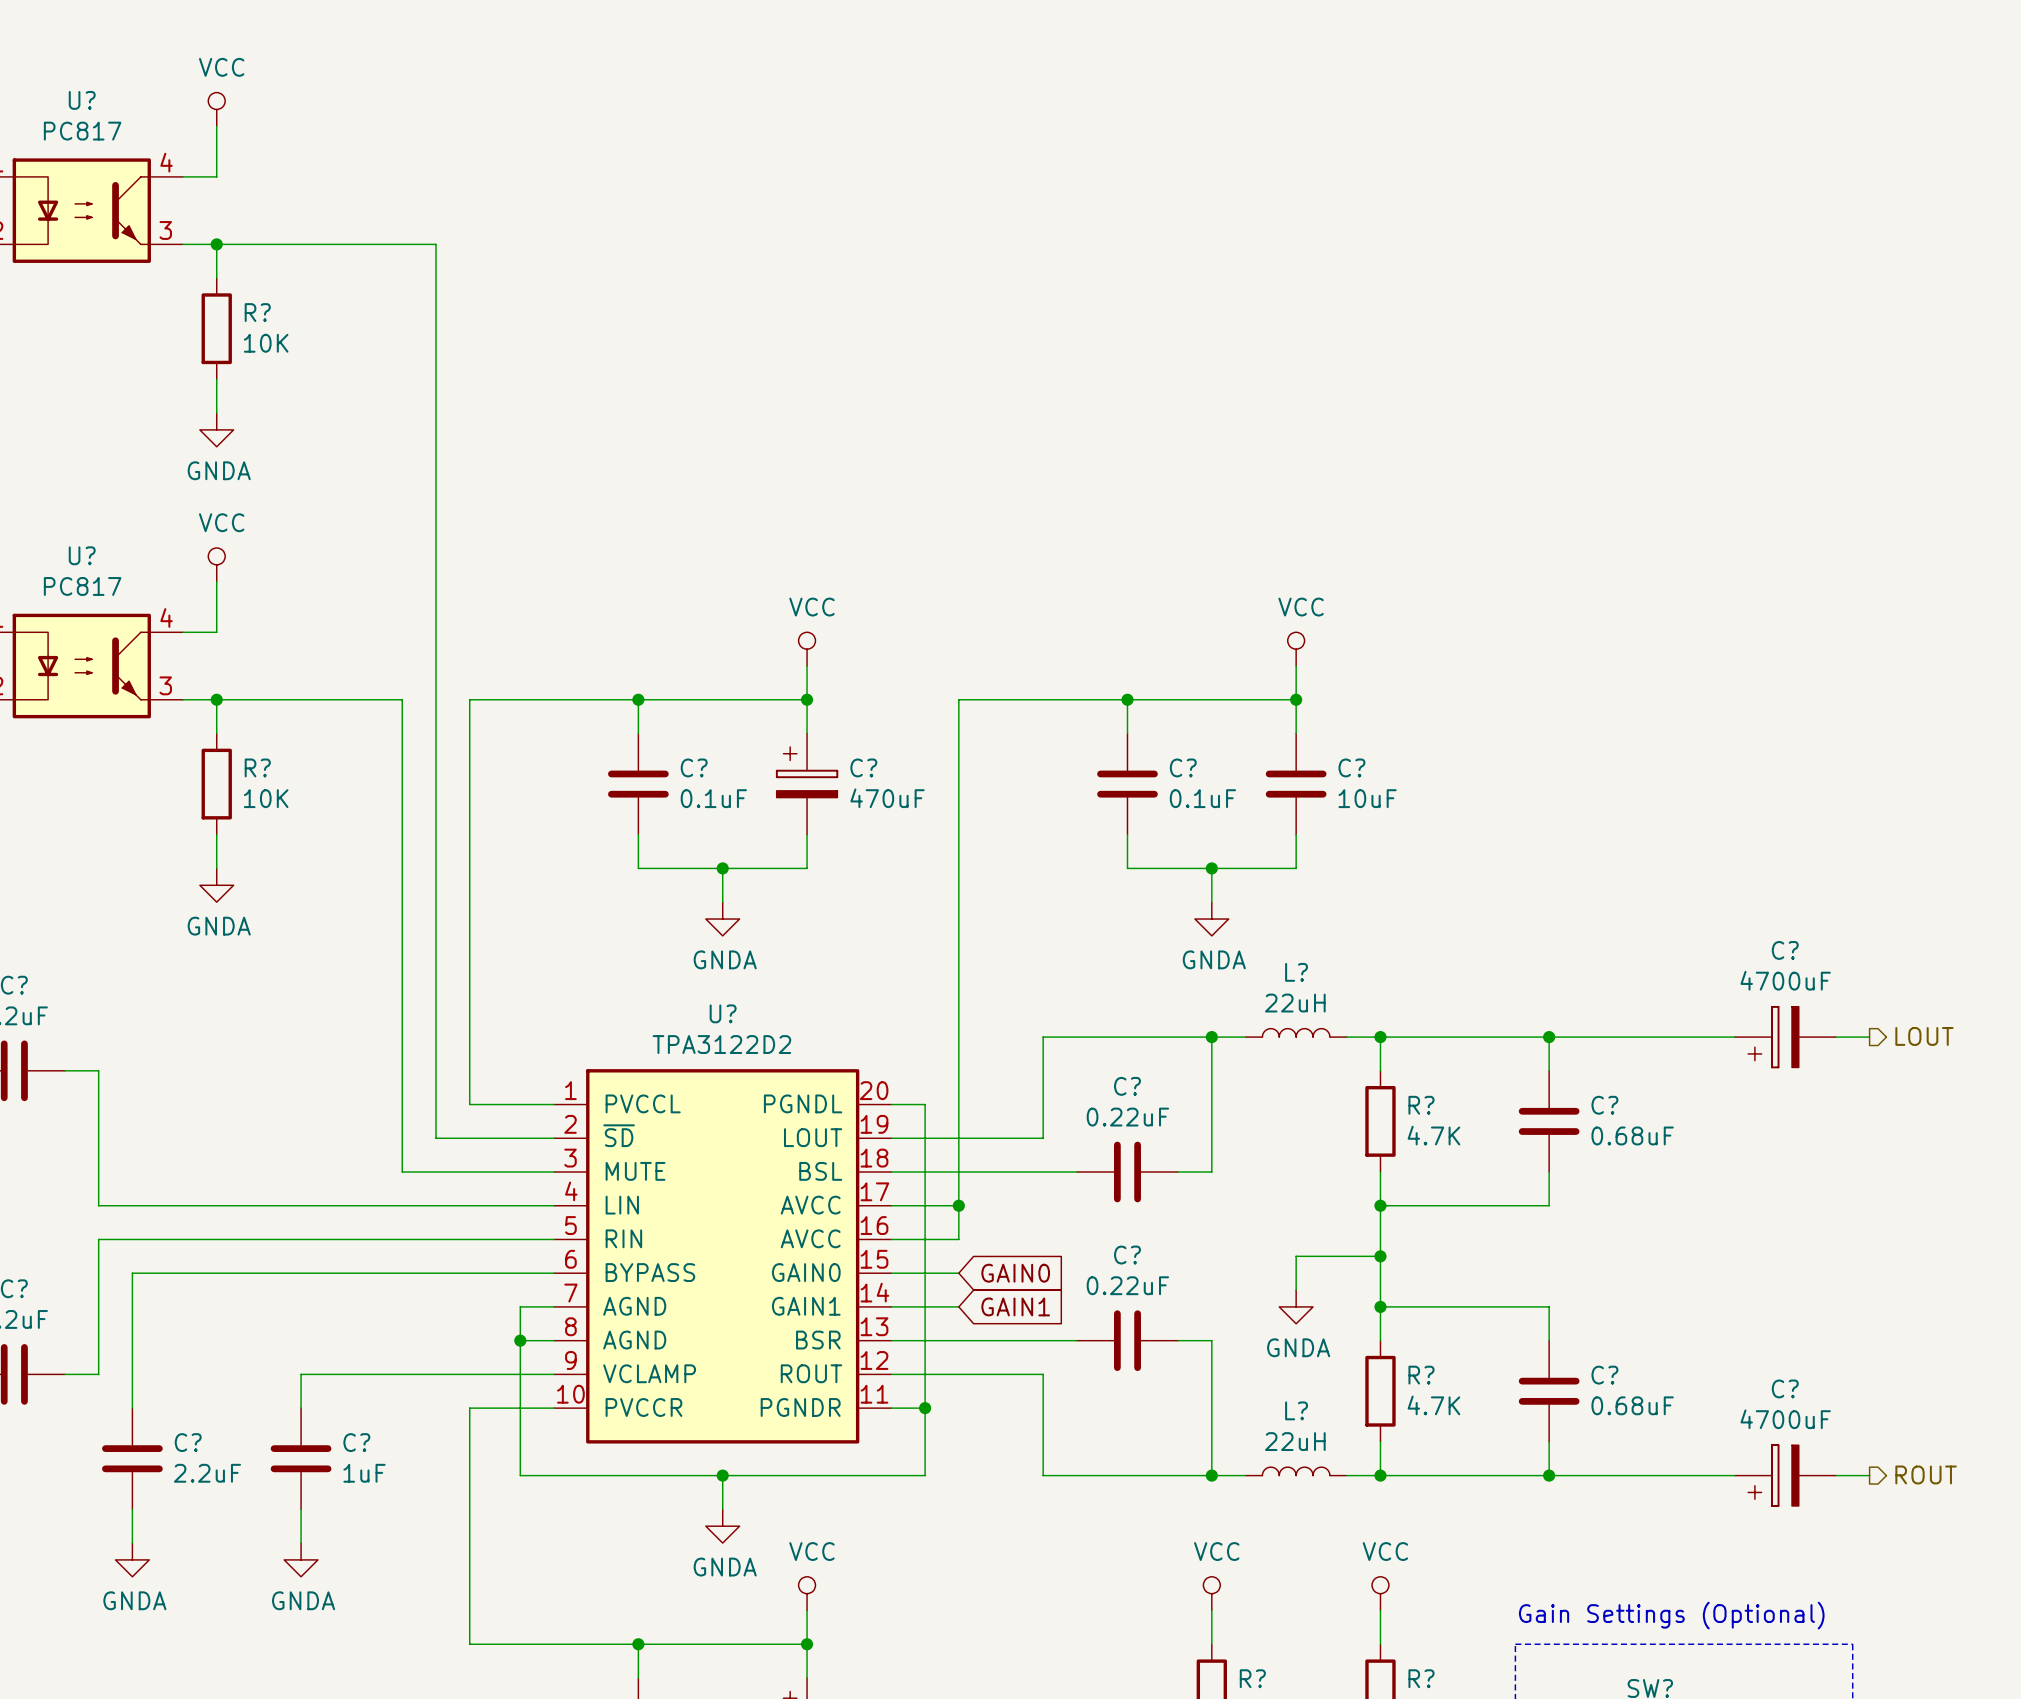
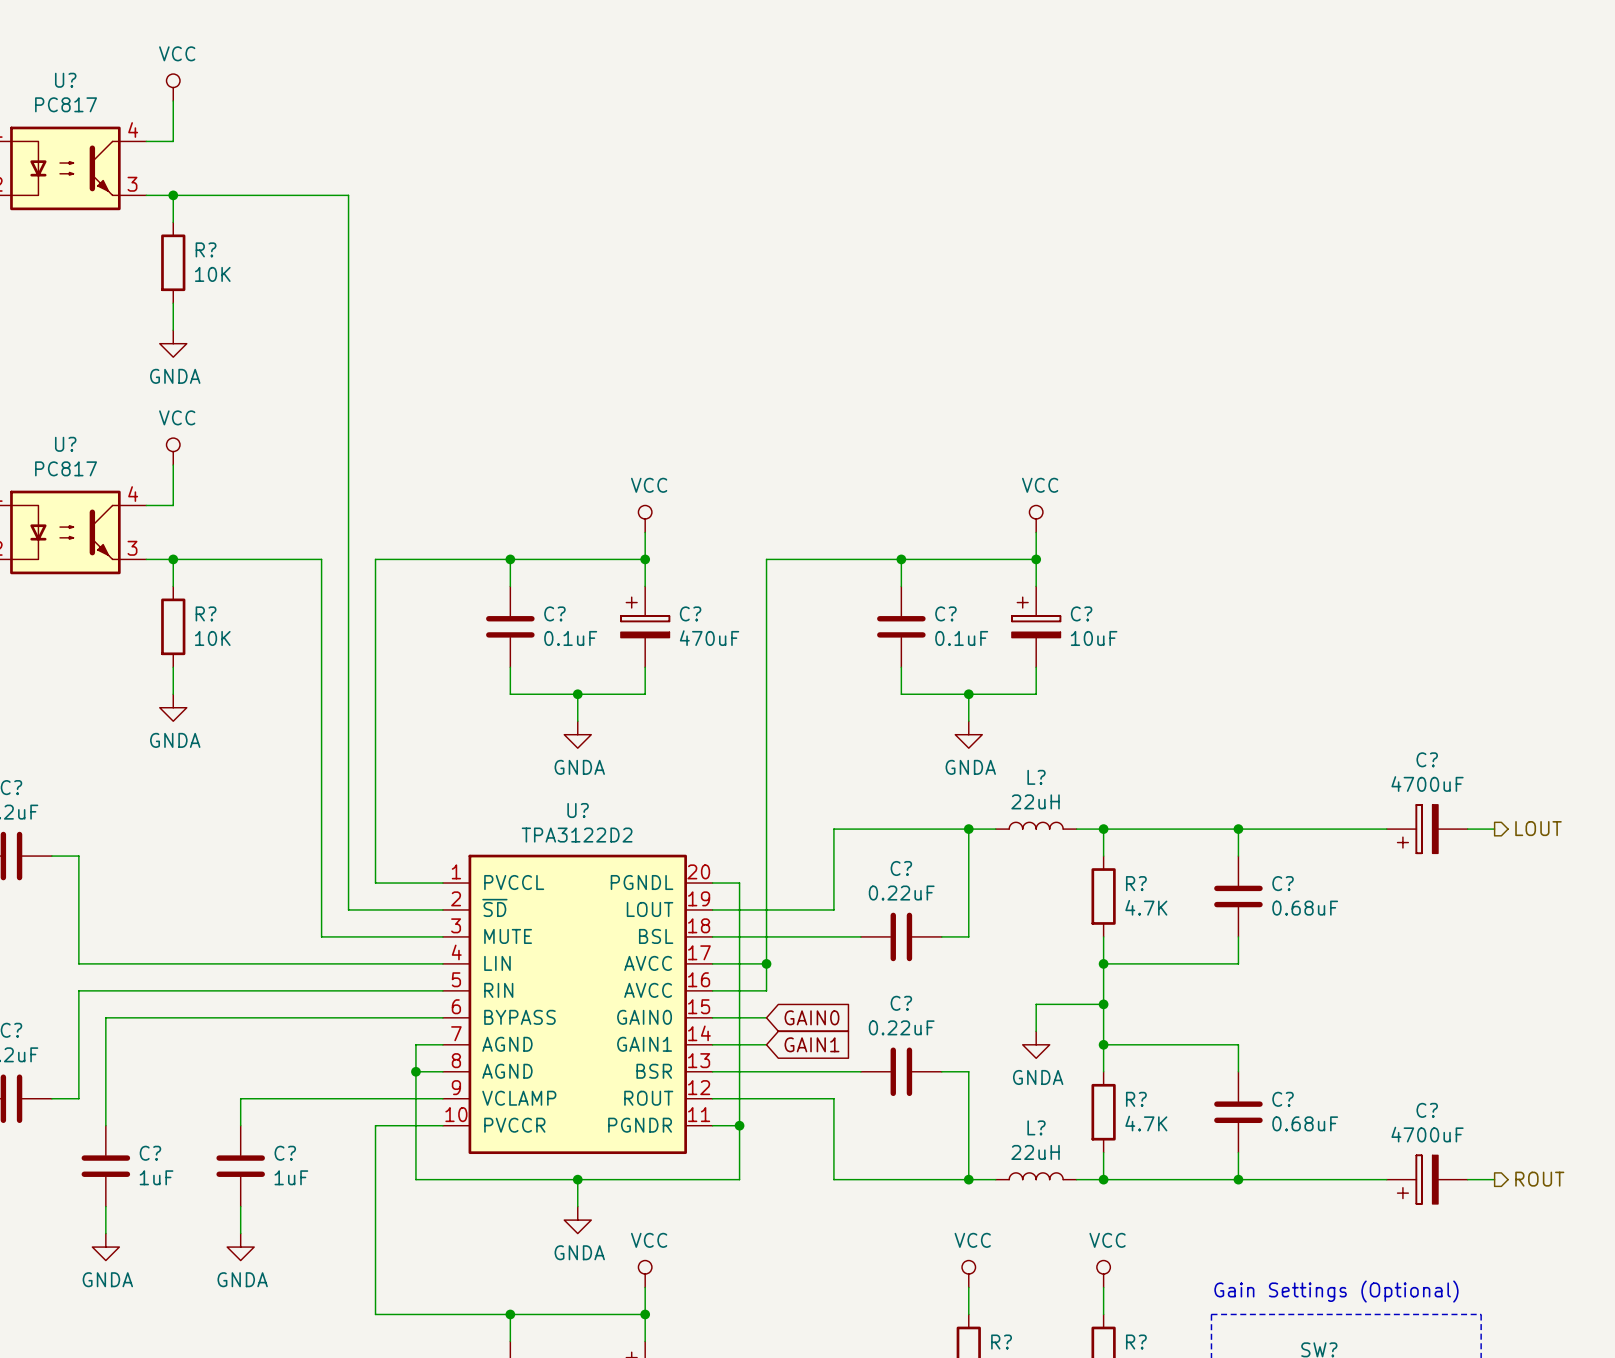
C? symbol: [1265, 733, 1327, 835] -> [1011, 586, 1061, 668]
C? value: 2.2uF (207, 1473) -> 1uF (156, 1177)

